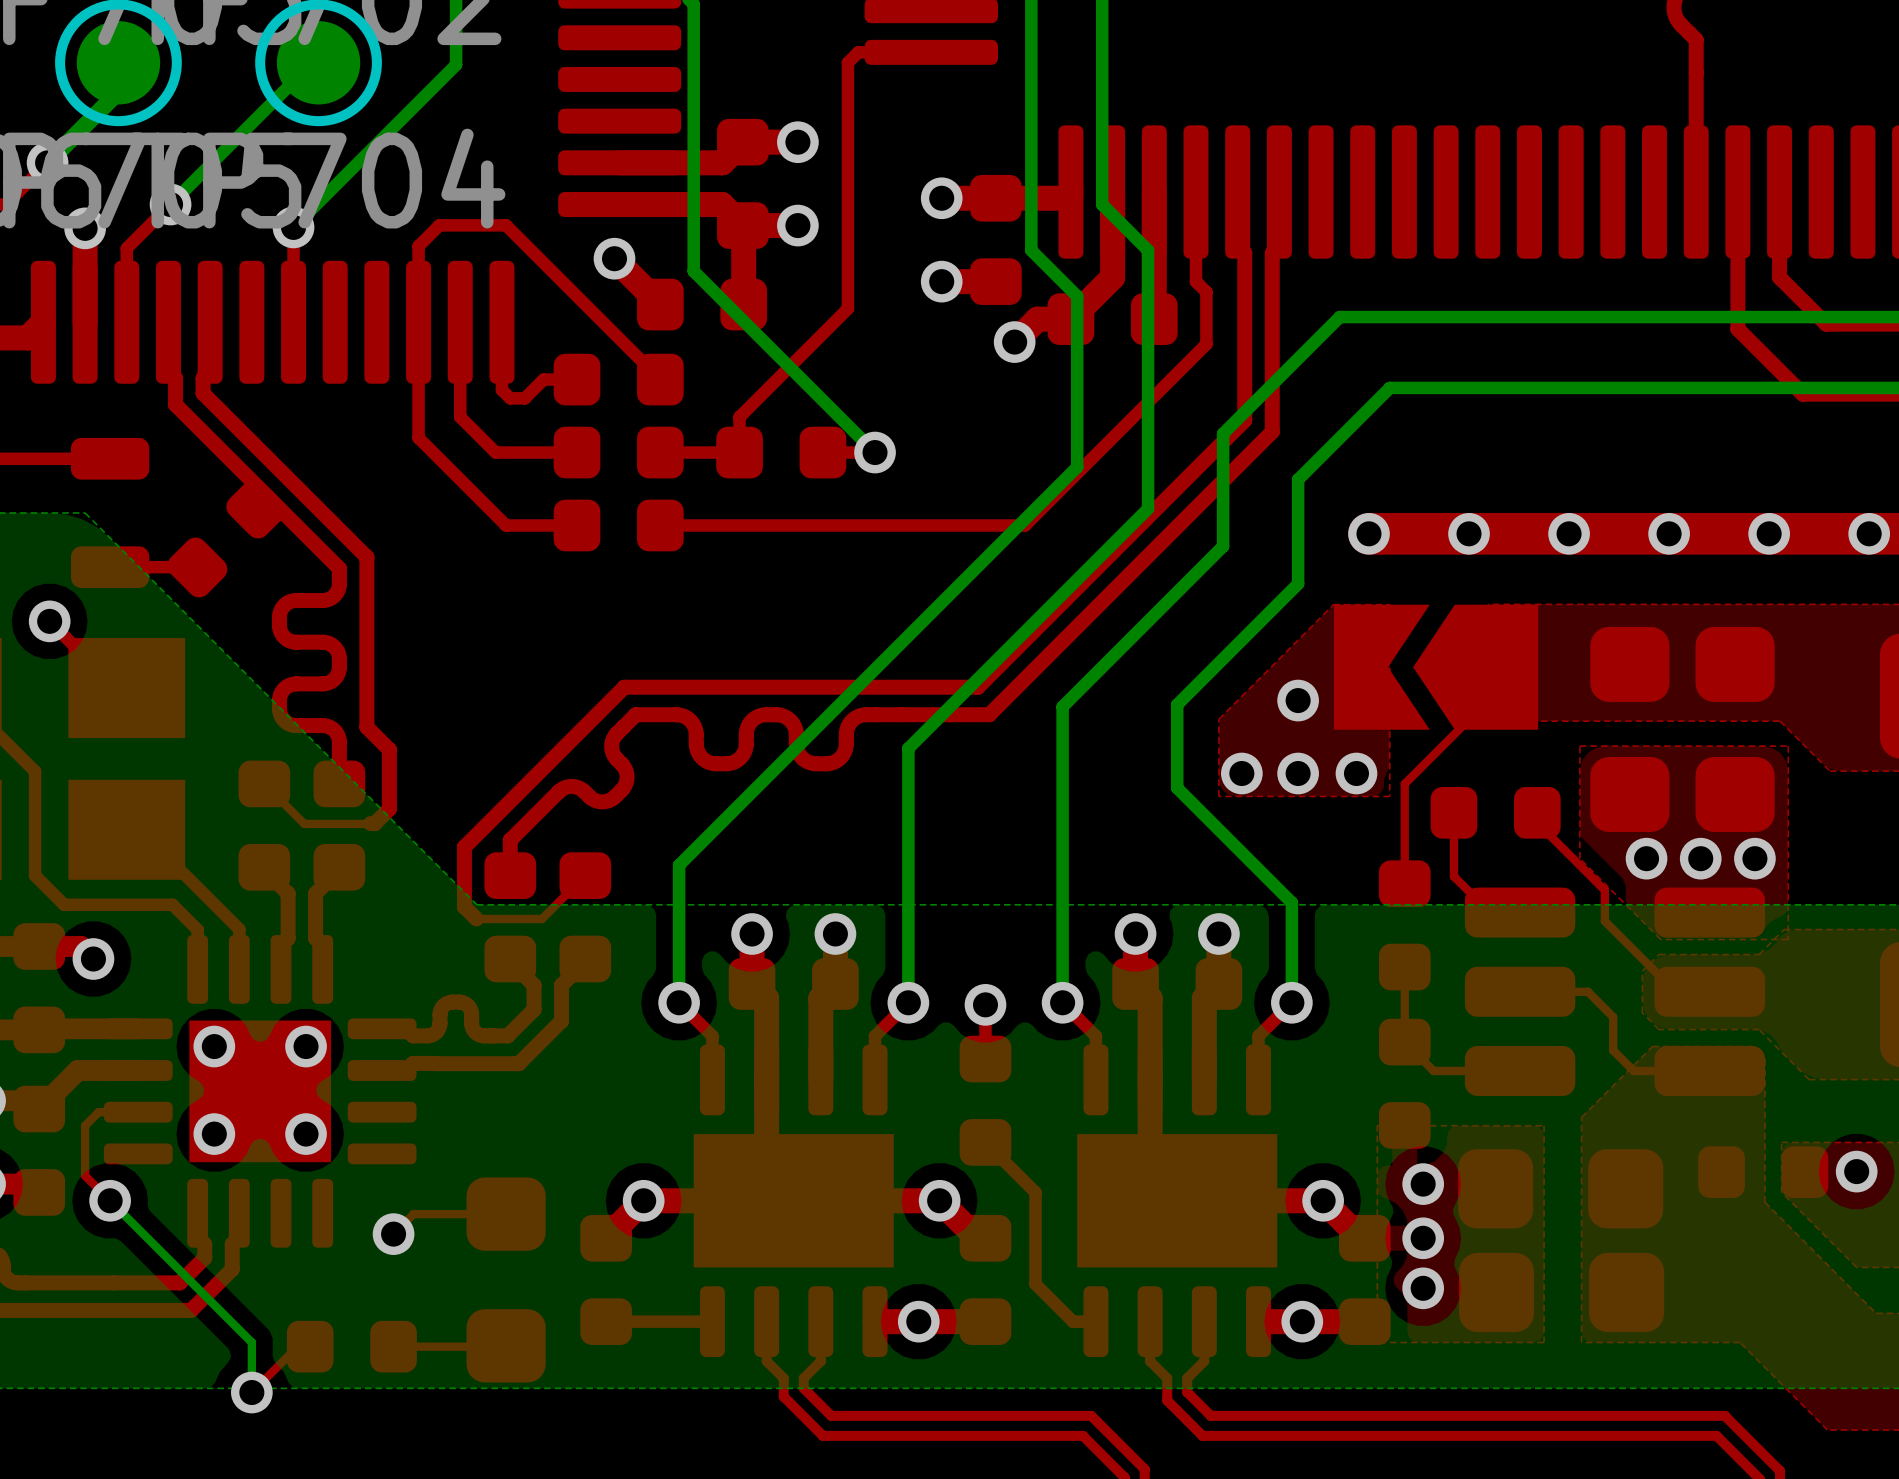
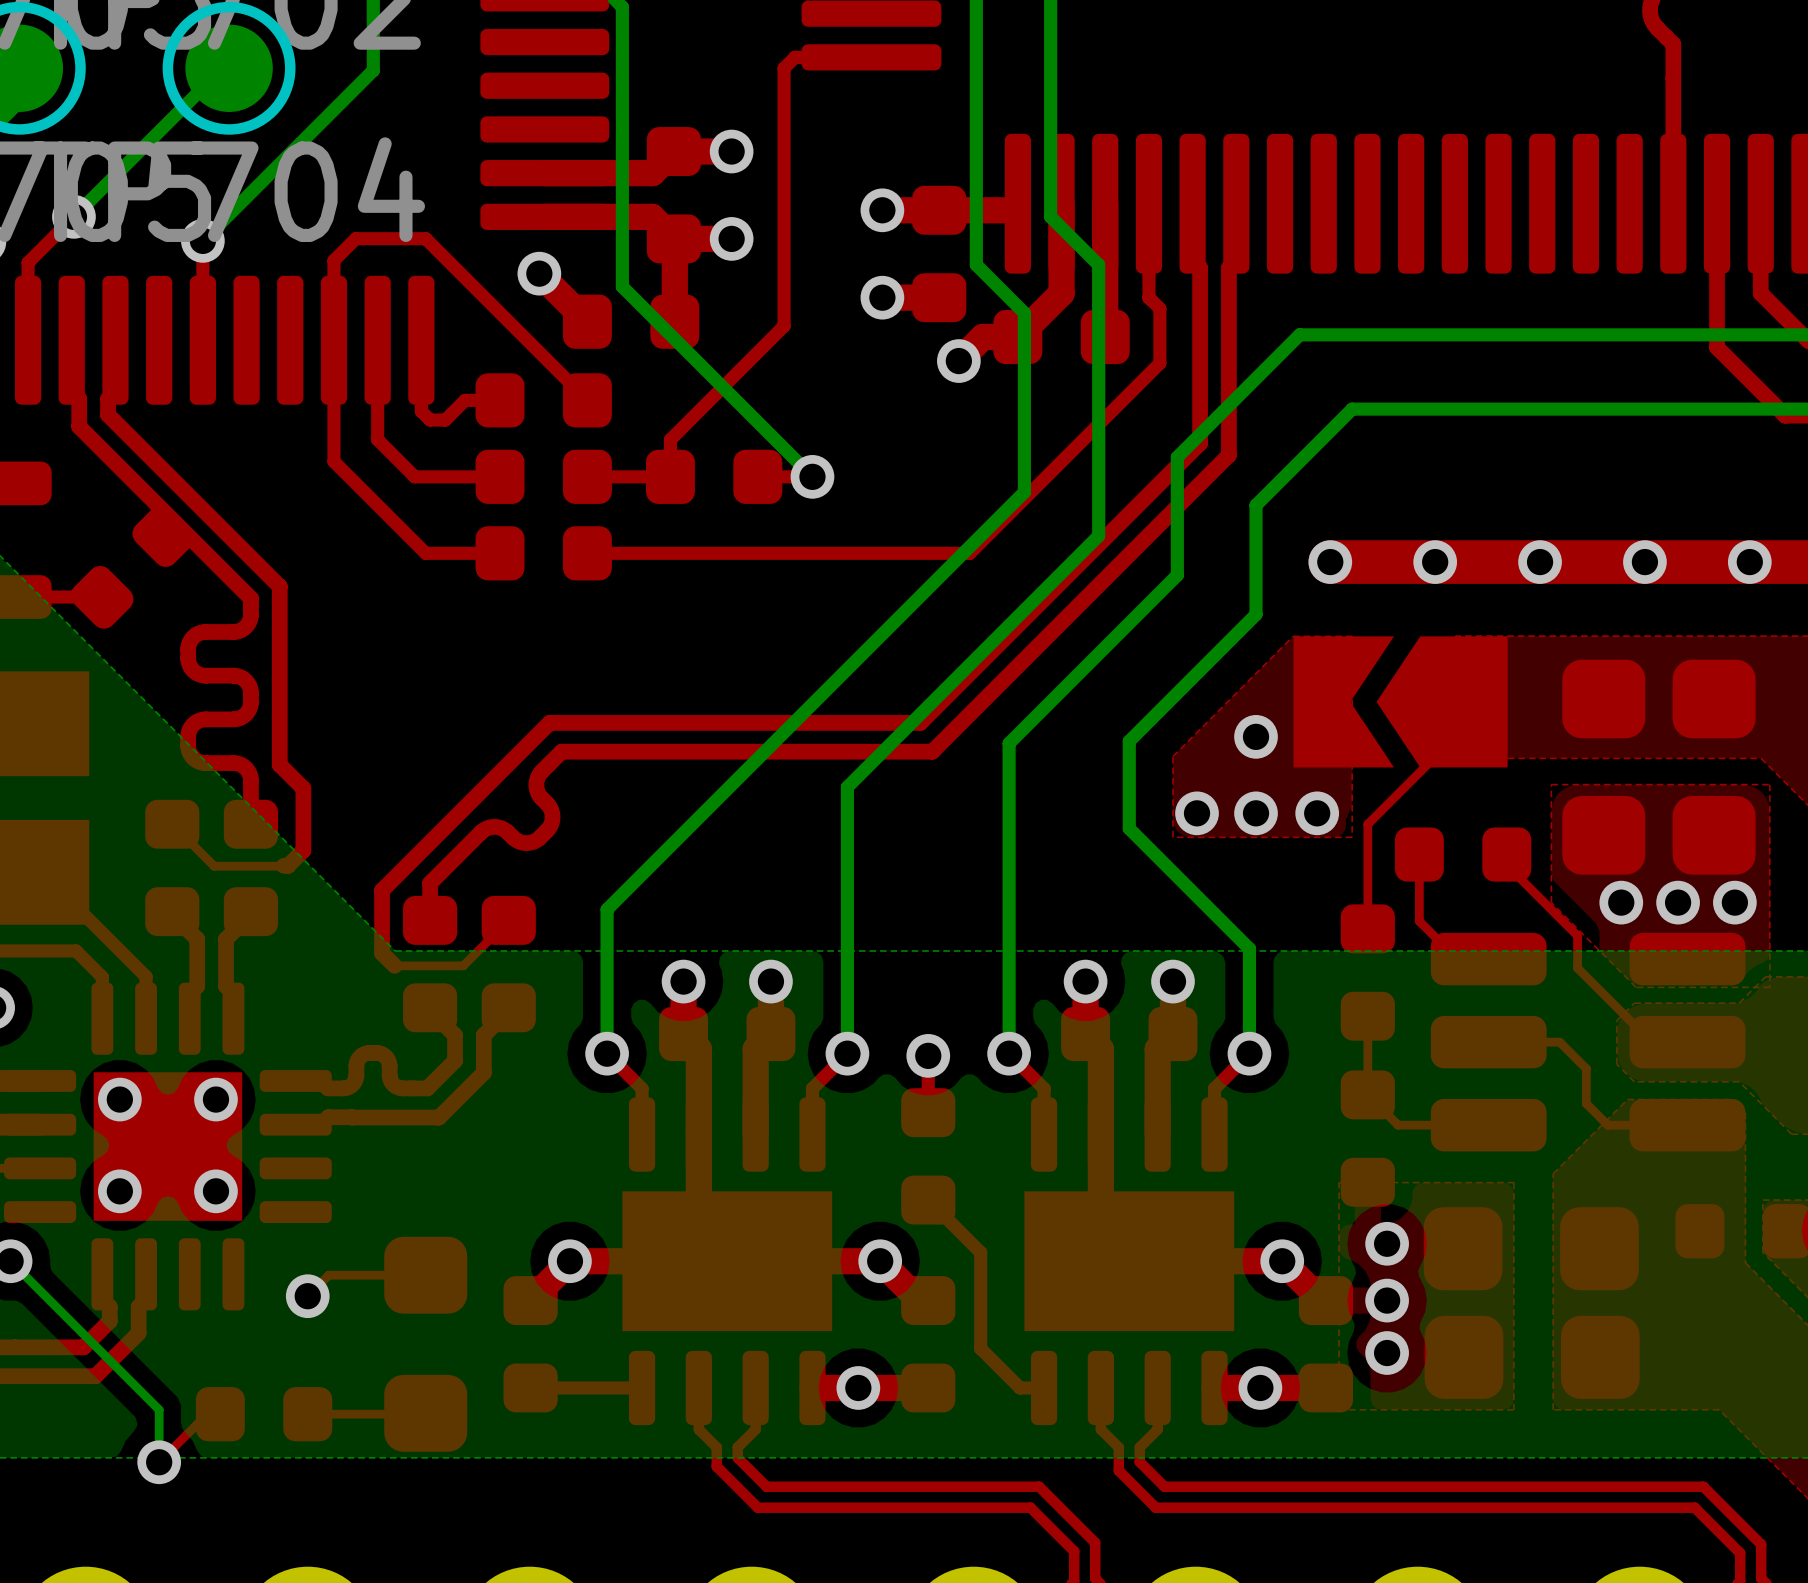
top track: (766, 714) (757, 716) (750, 722) (746, 730) (746, 746) (743, 754) (734, 761) (726, 763) (711, 763) (702, 757) (696, 748) (696, 732) (693, 724) (684, 716) (676, 714) -> (698, 751) (604, 751)
top track: (866, 714) (855, 717) (849, 724) (846, 732) (845, 748) (841, 756) (834, 761) (826, 763) (811, 763) (802, 757) (796, 748) (796, 732) (793, 724) (784, 716) (776, 714) -> (803, 751) (708, 751)

